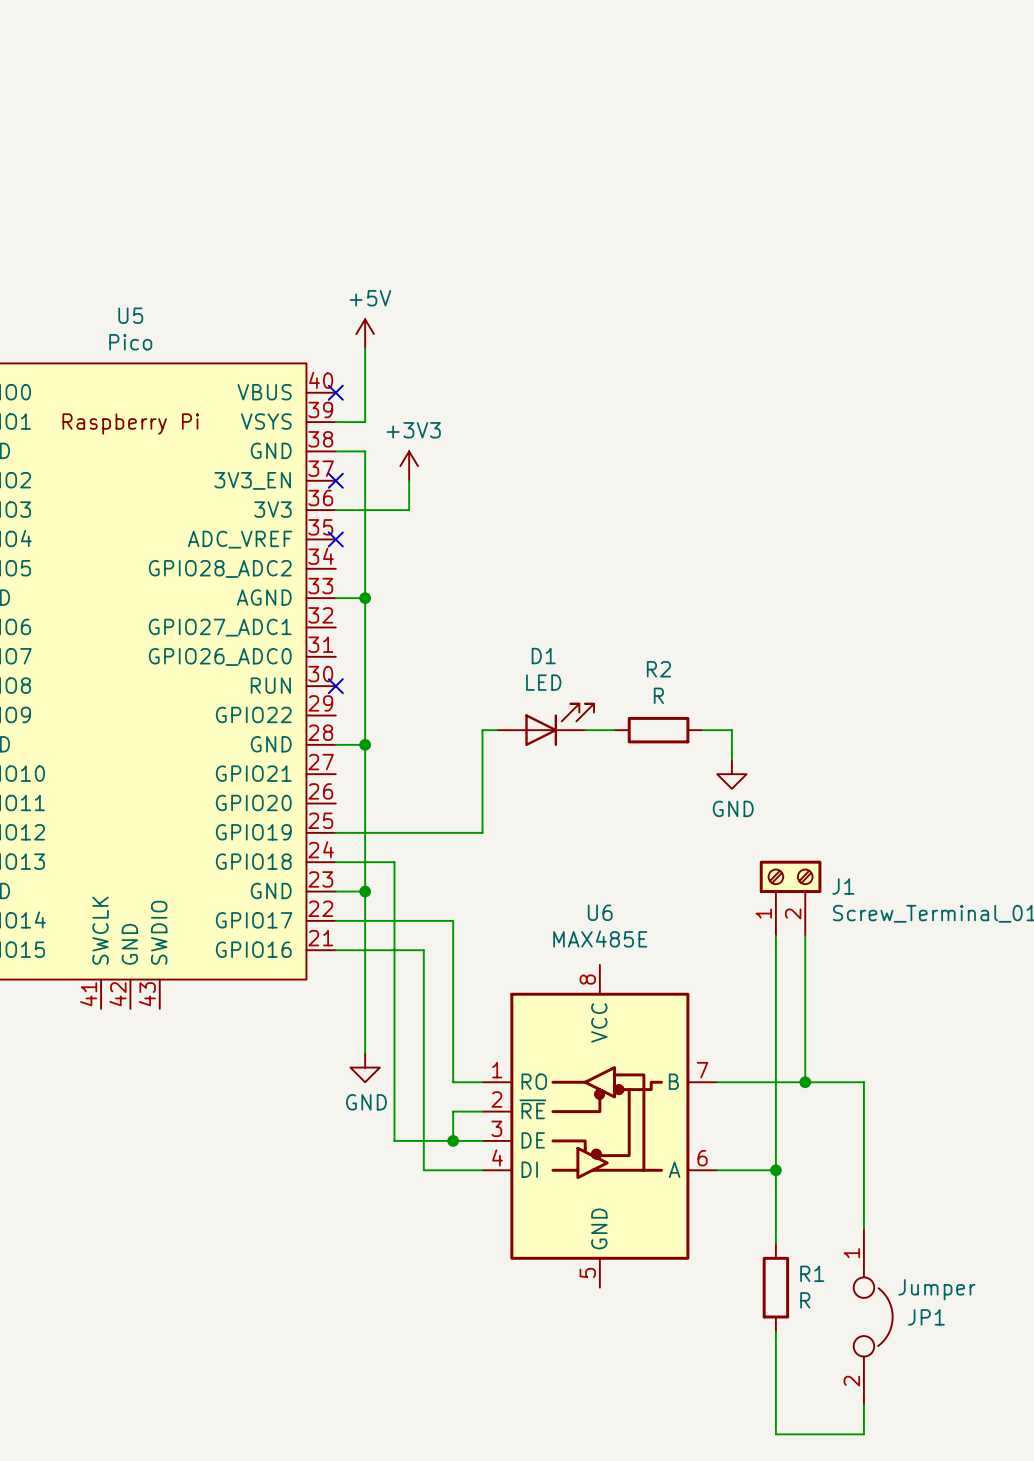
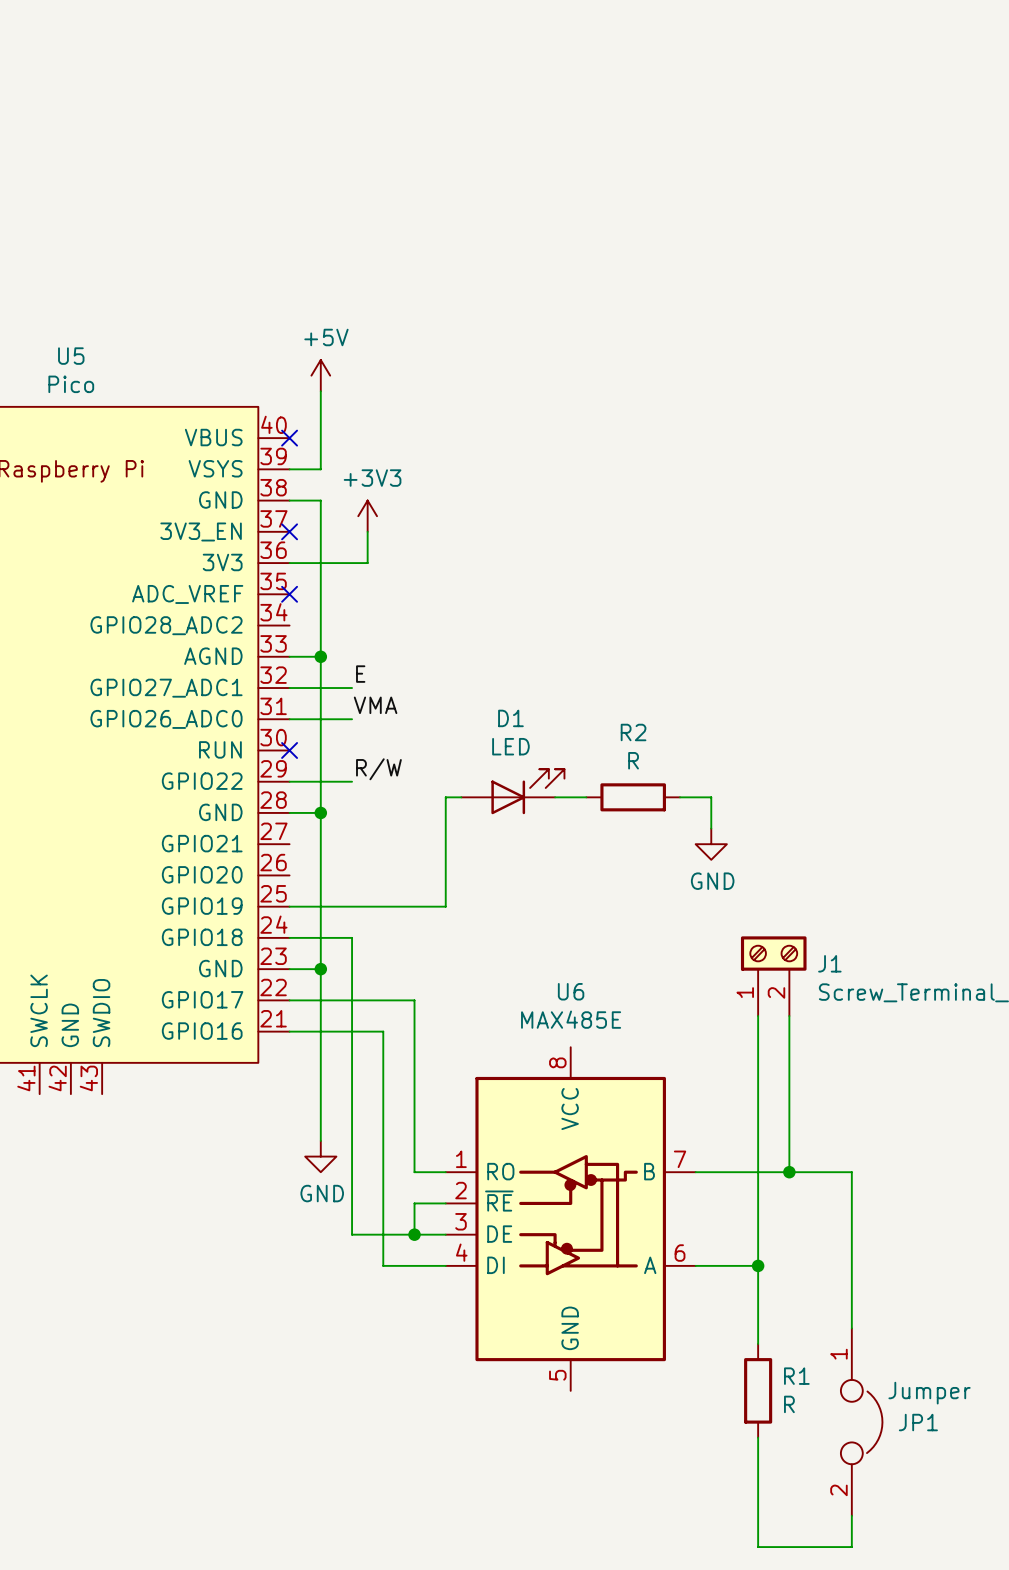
label: none -> E (360, 674)
wire: none -> (289, 688) (352, 688)
label: none -> VMA (375, 705)
wire: none -> (289, 719) (352, 719)
label: none -> R/W (378, 769)
wire: none -> (289, 781) (352, 781)

